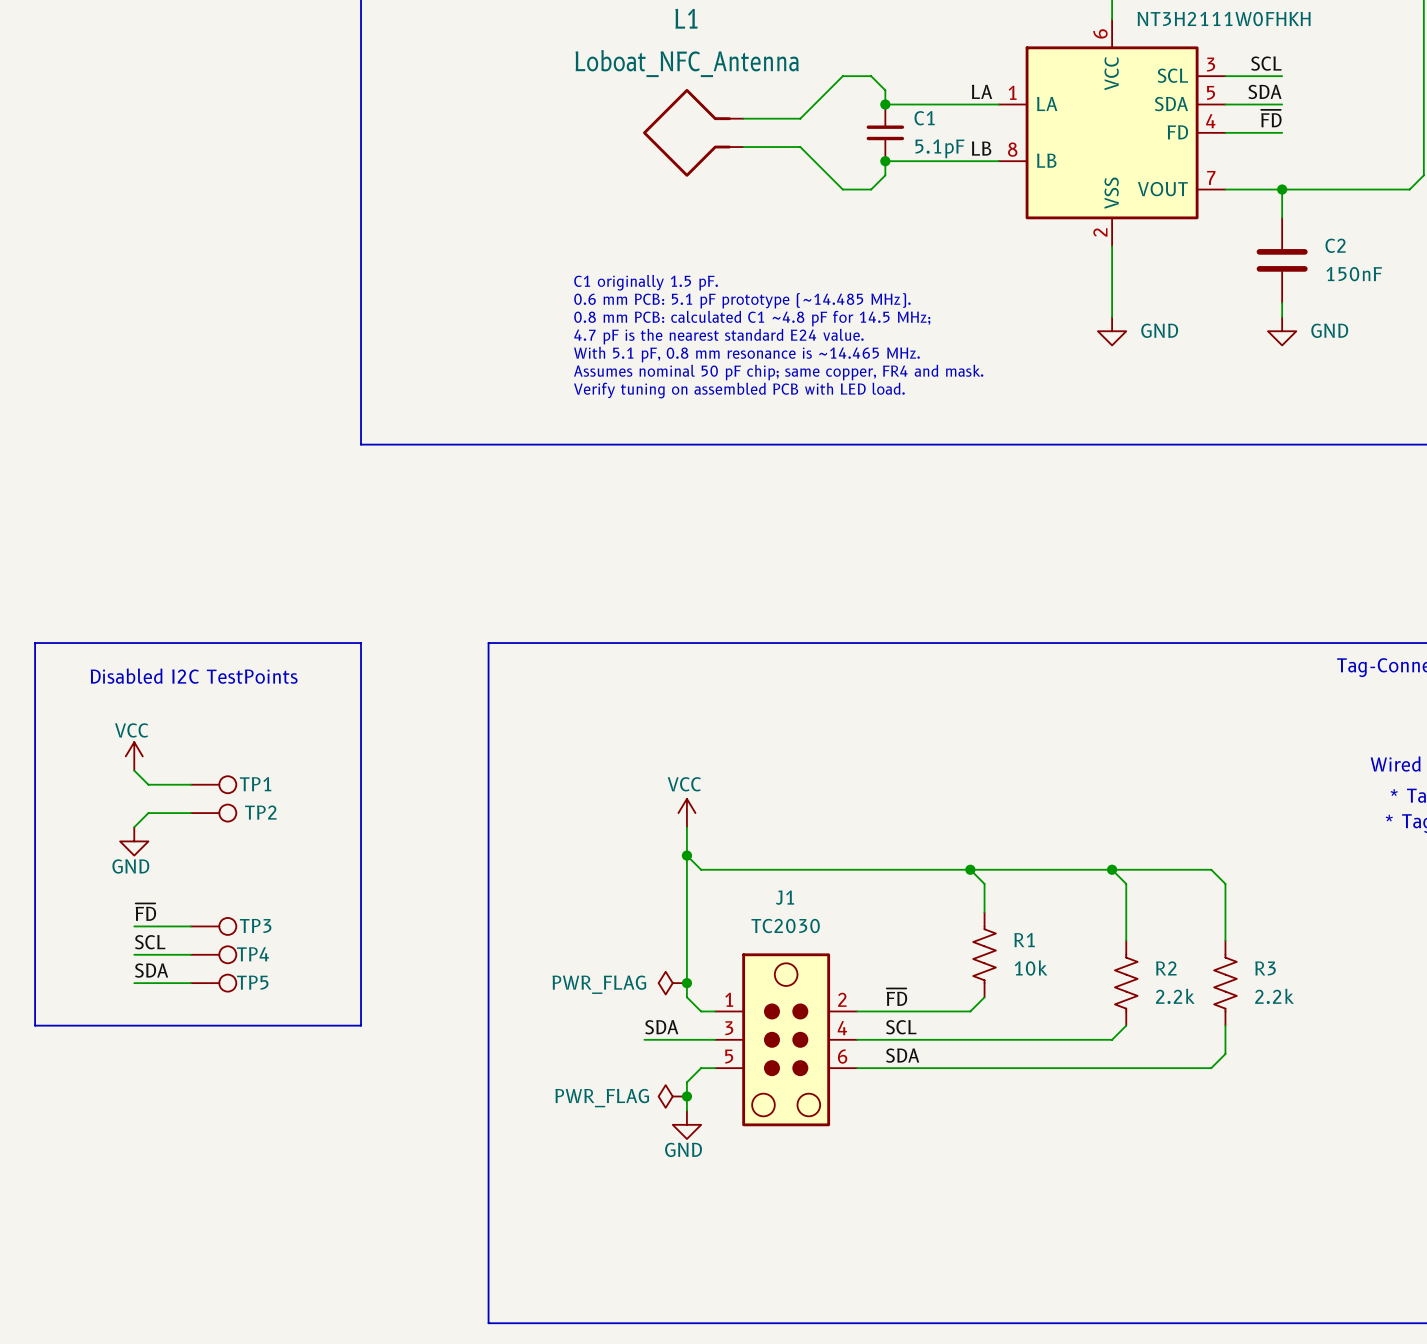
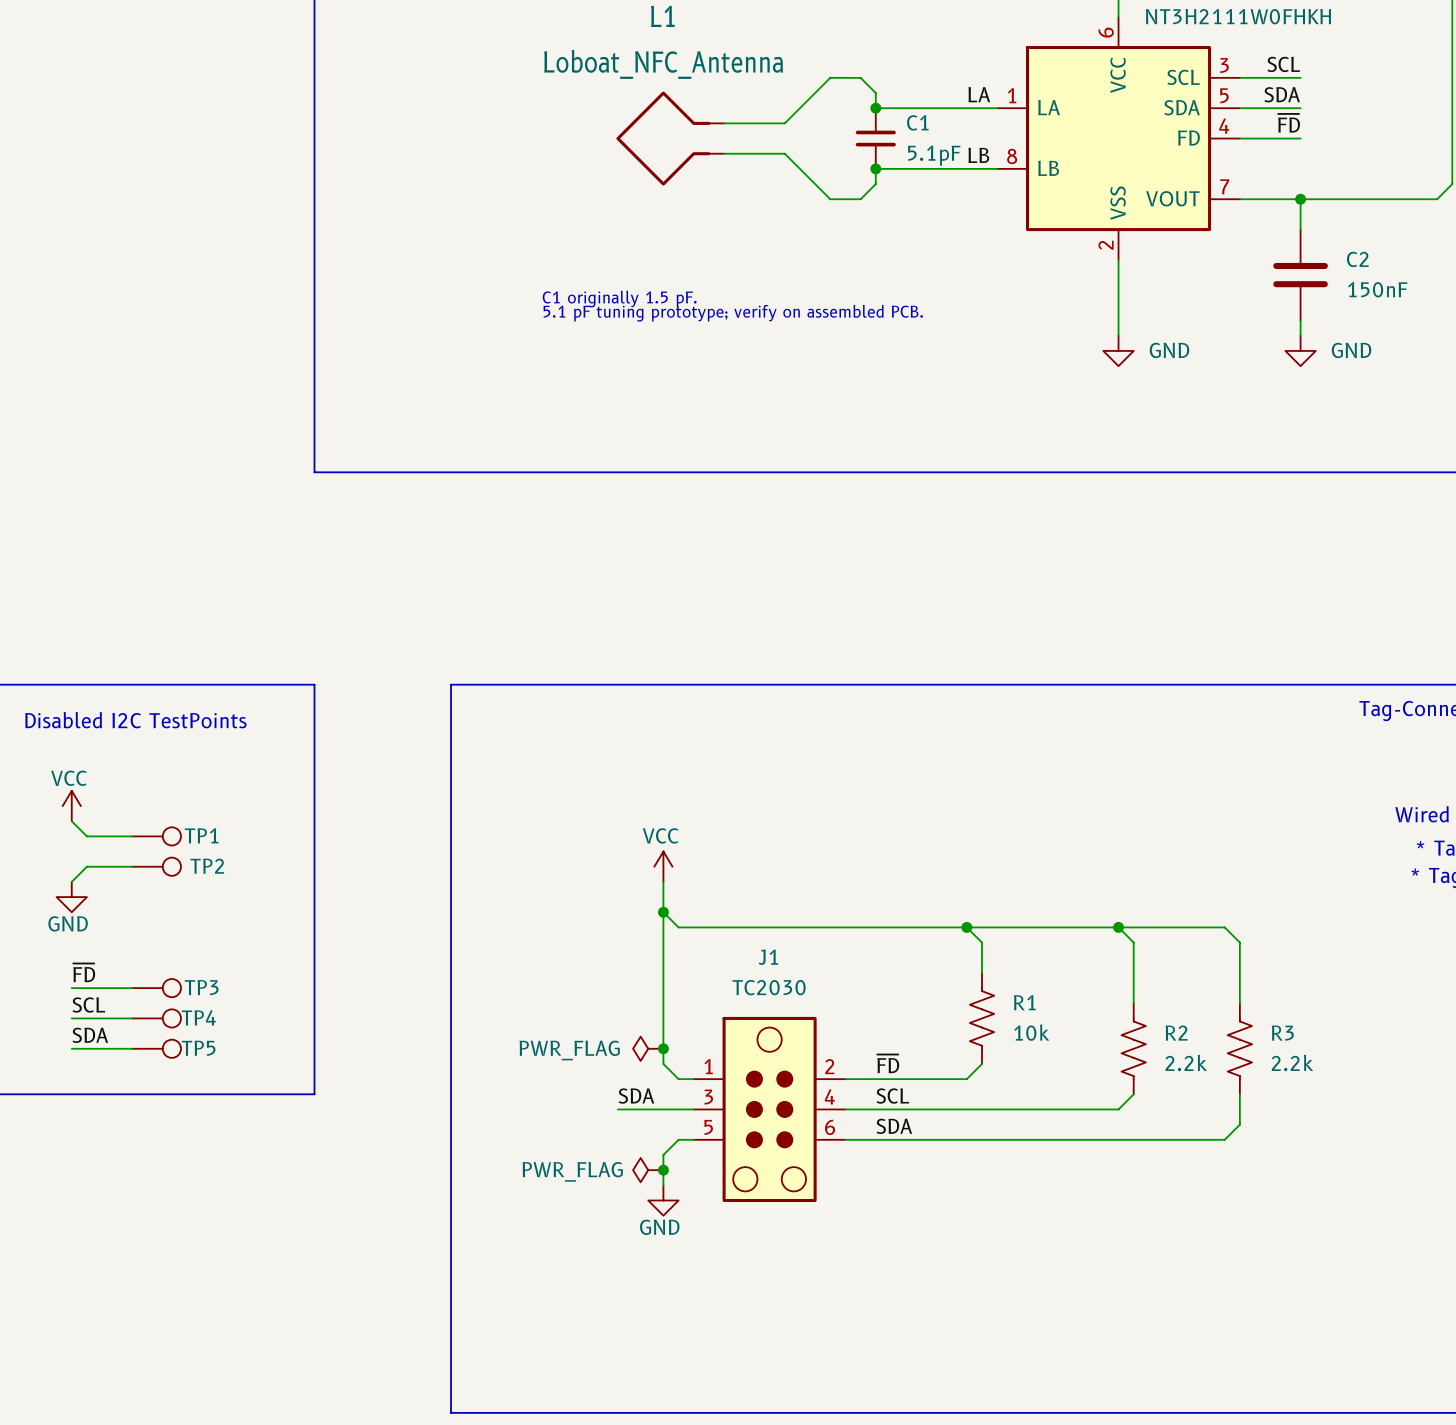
text: 0.6 mm PCB: 5.1 pF prototype (~14.485 MHz). (742, 300) -> 5.1 pF tuning prototype; verify on assembled PCB. (733, 313)
text: 0.8 mm PCB: calculated C1 ~4.8 pF for 14.5 MHz; (752, 318) -> none
text: 4.7 pF is the nearest standard E24 value. (718, 336) -> none
text: With 5.1 pF, 0.8 mm resonance is ~14.465 MHz. (746, 354) -> none
text: Assumes nominal 50 pF chip; same copper, FR4 and mask. (778, 372) -> none
text: Verify tuning on assembled PCB with LED load. (739, 390) -> none

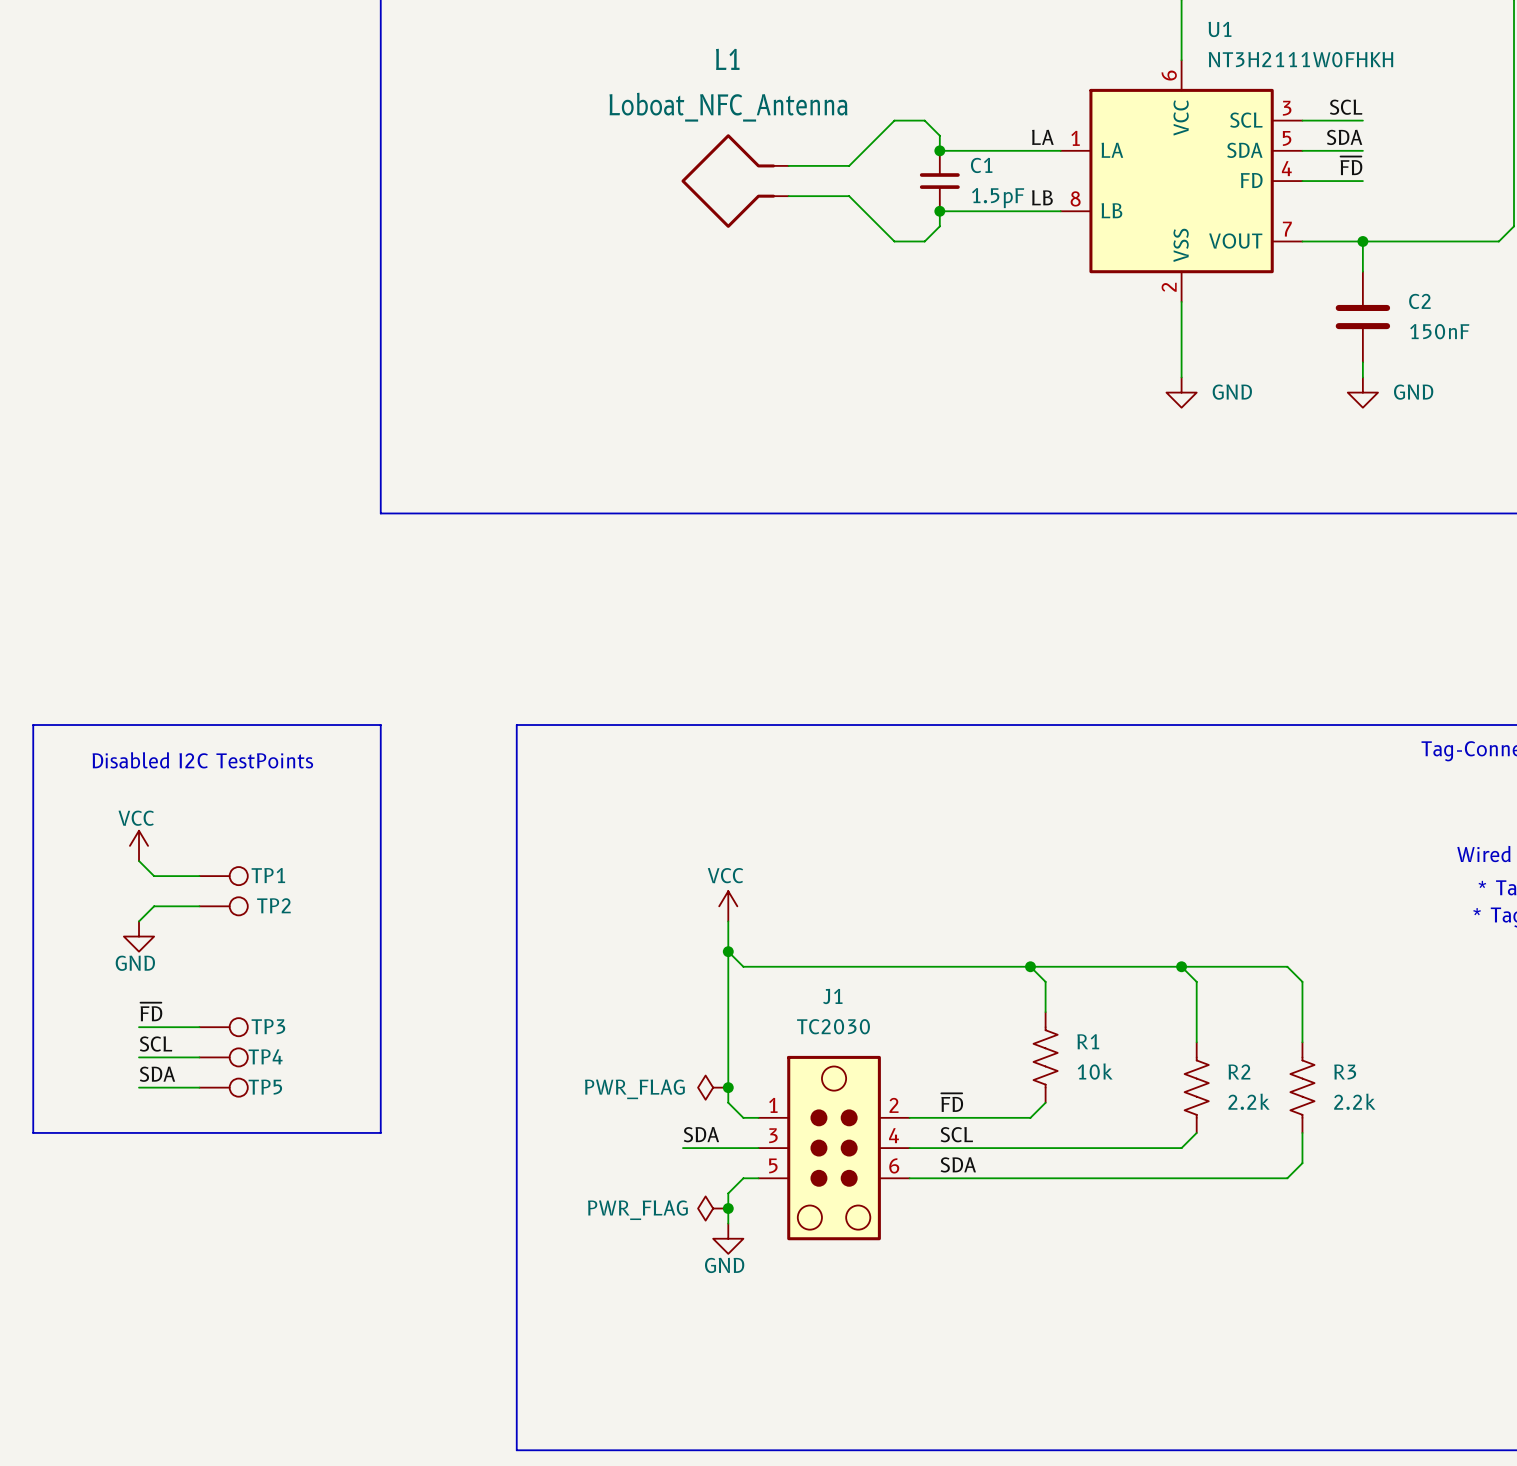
C1 value: 5.1pF (934, 155) -> 1.5pF (998, 198)
text: C1 originally 1.5 pF. (619, 299) -> none
text: 5.1 pF tuning prototype; verify on assembled PCB. (733, 313) -> none

